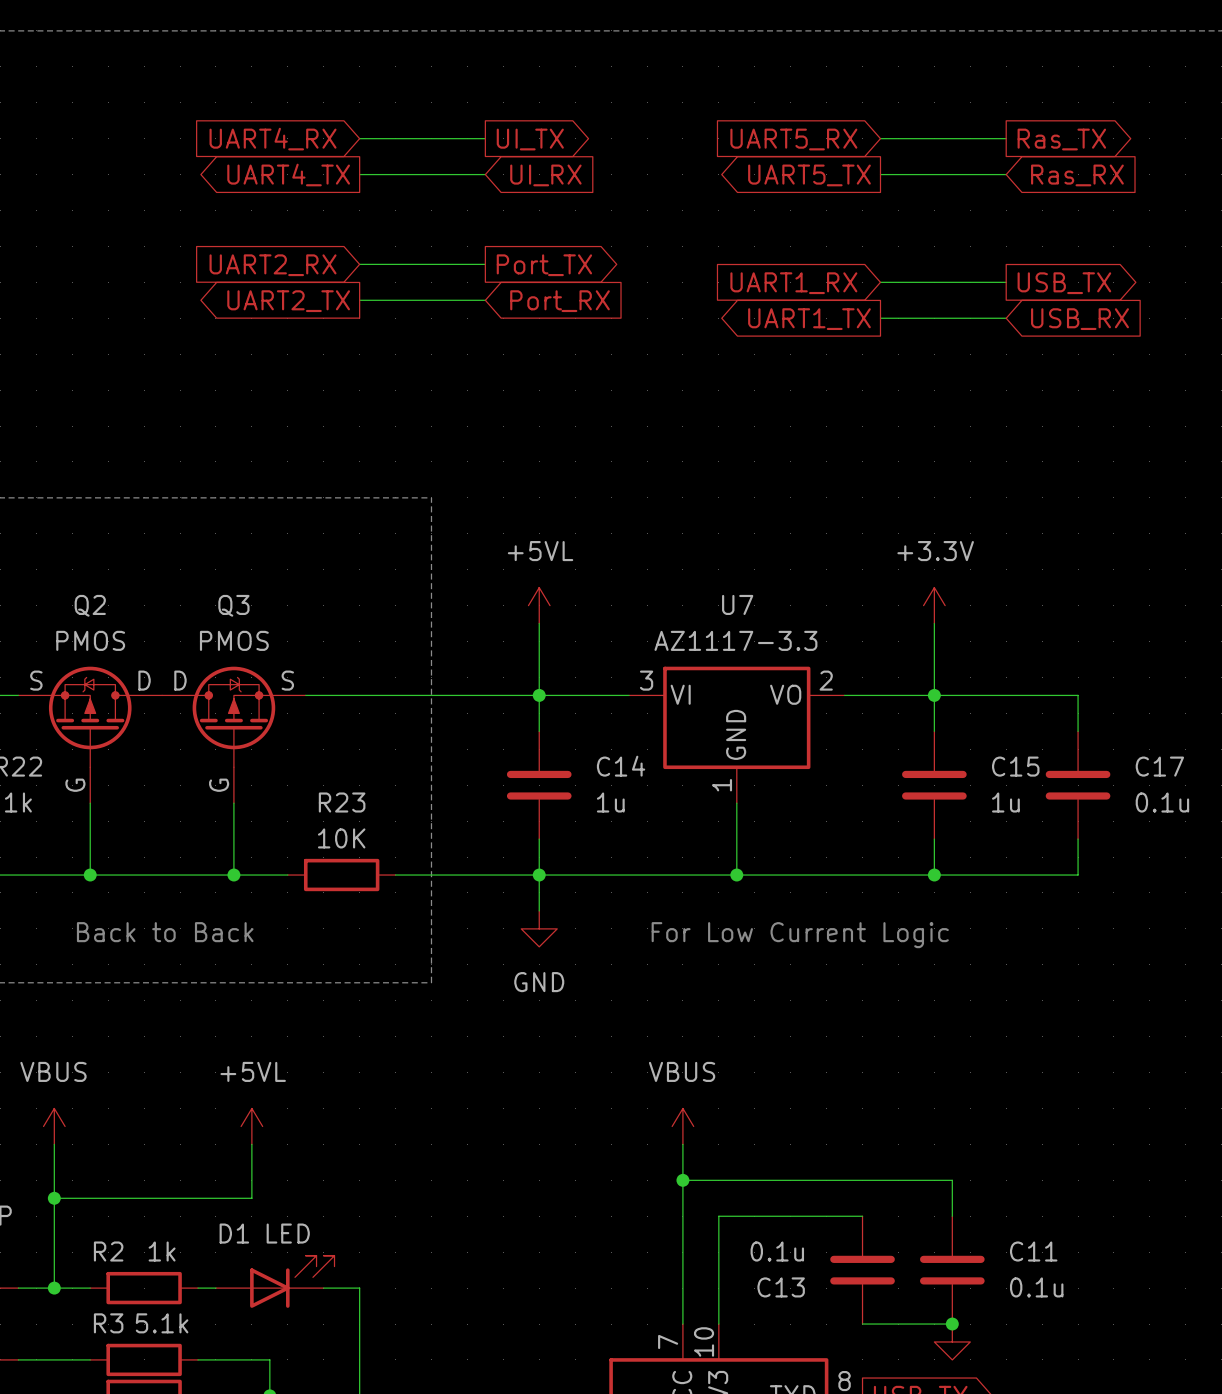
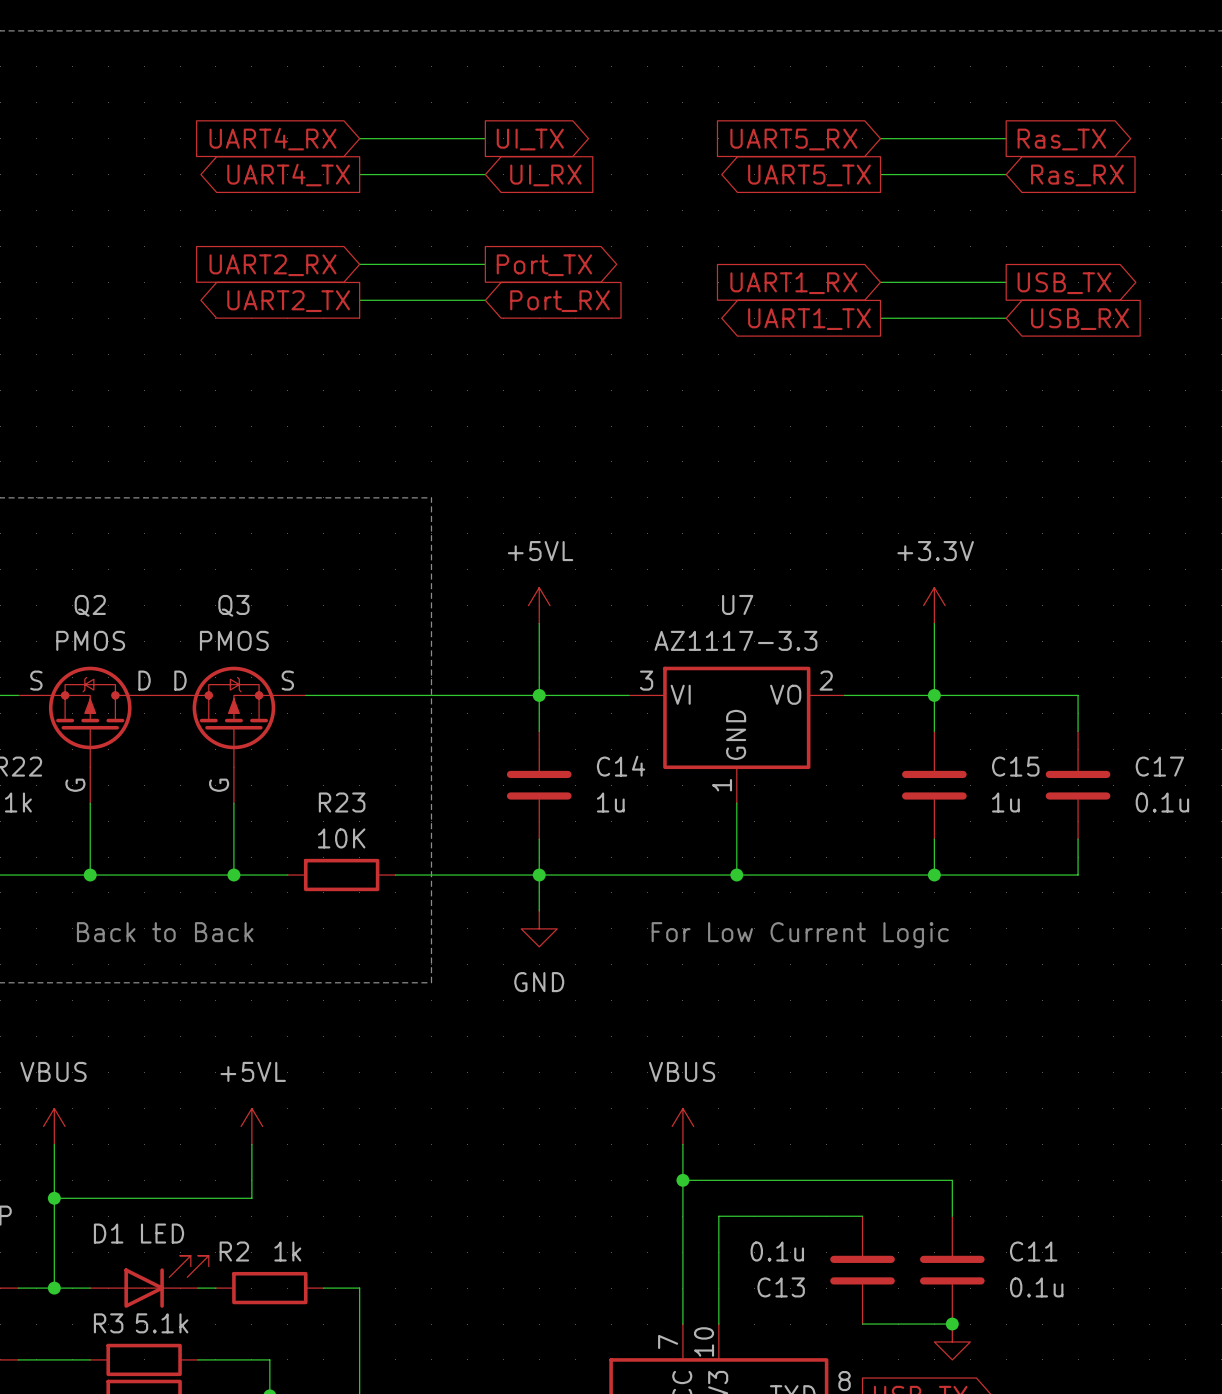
D1 position: (275, 1281) -> (149, 1281)
R2 position: (144, 1288) -> (269, 1288)

